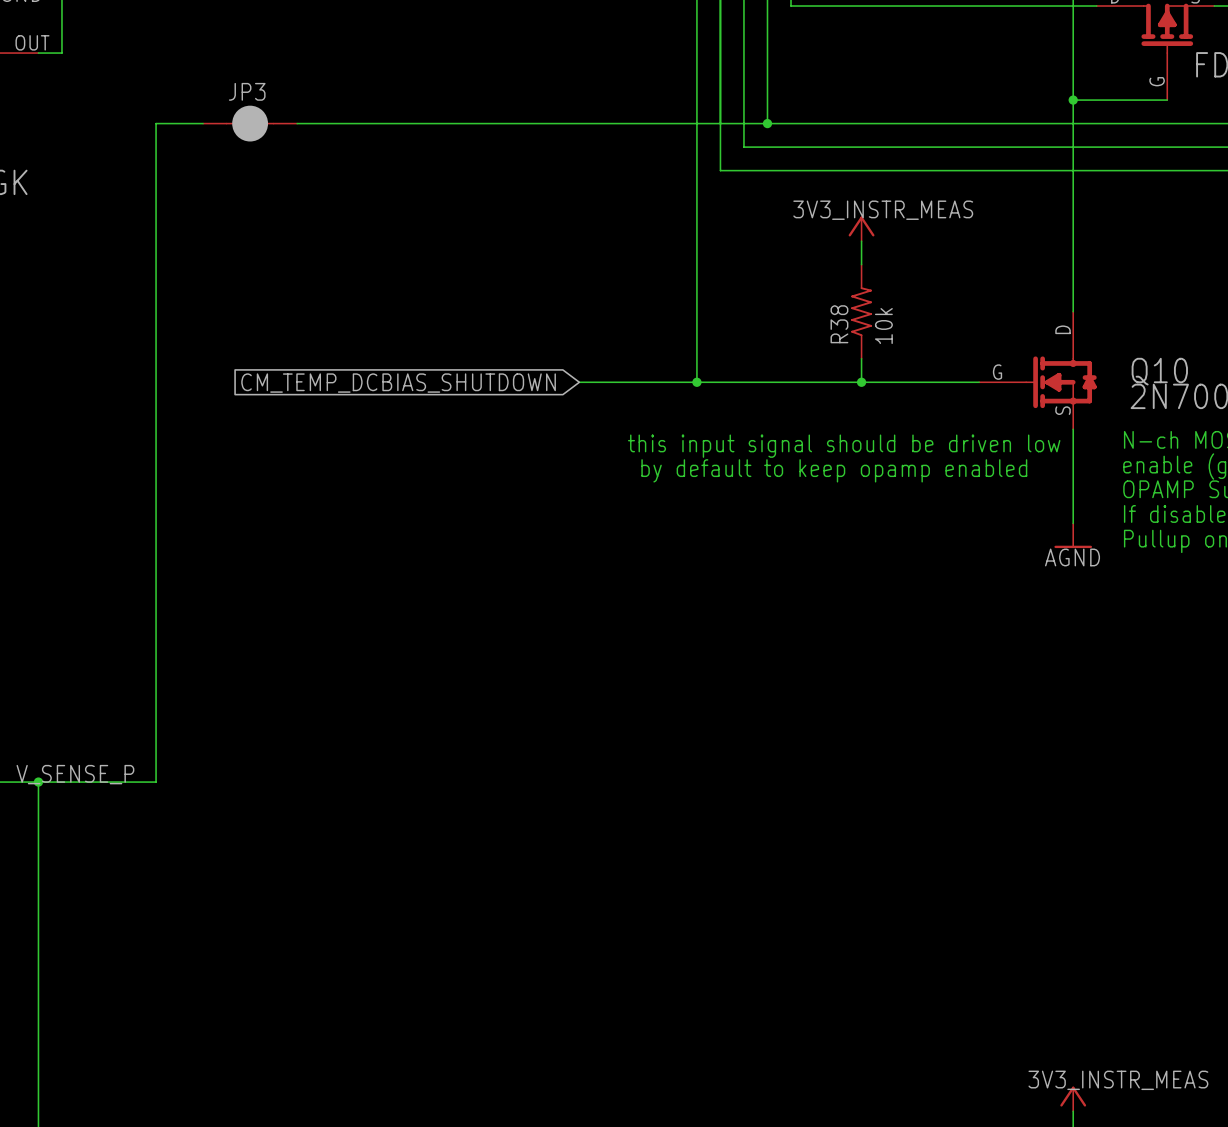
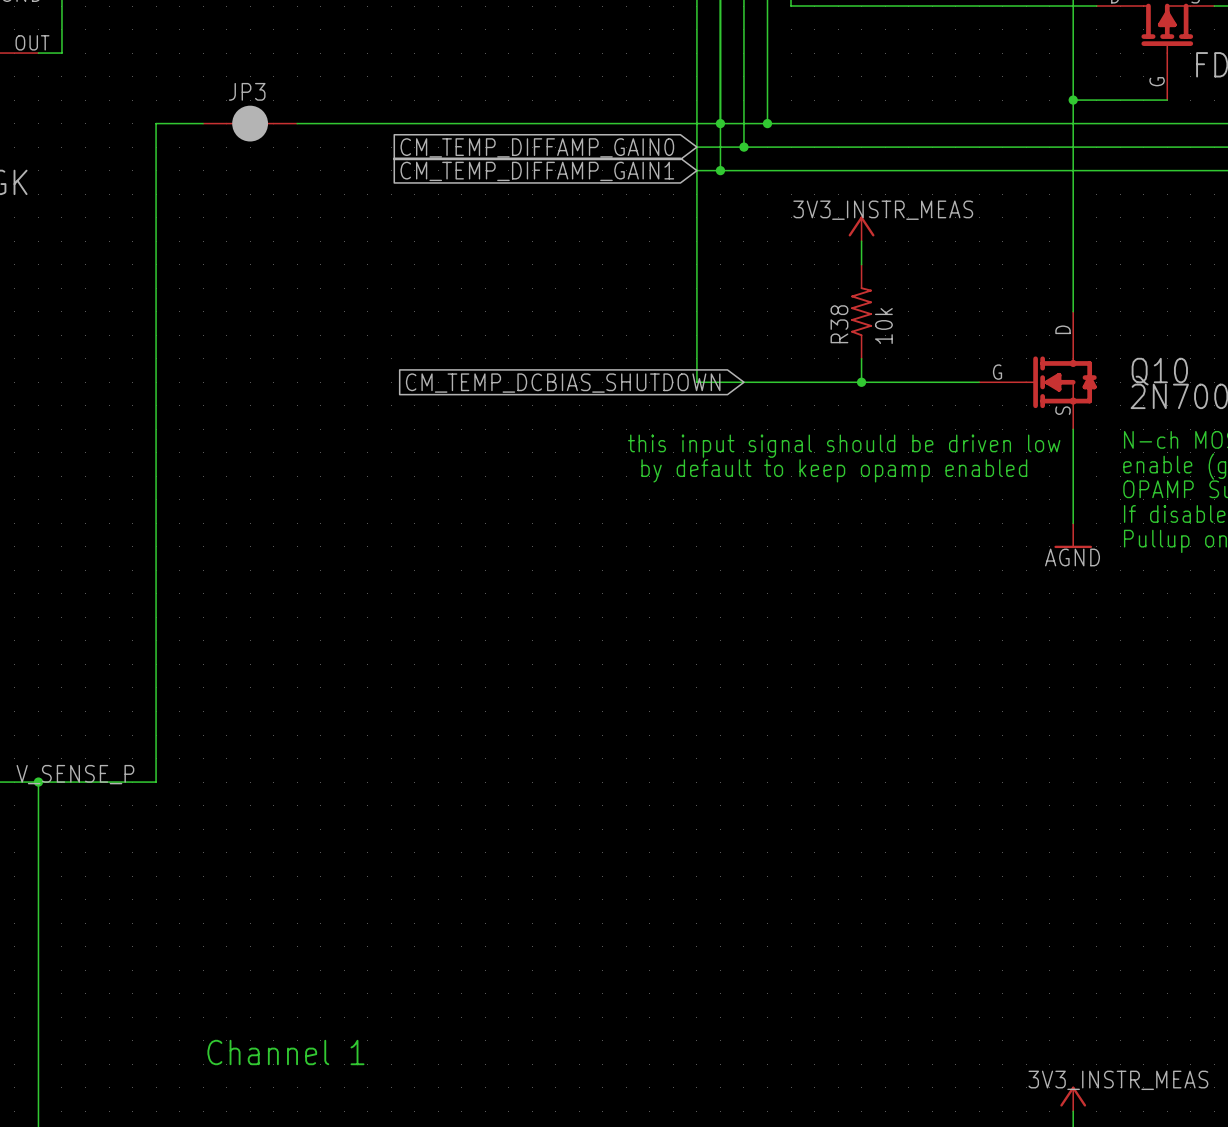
junction: none -> (720, 123)
global label: none -> CM_TEMP_DIFFAMP_GAIN0 (537, 147)
wire: none -> (696, 147) (743, 147)
junction: none -> (743, 147)
wire: none -> (696, 170) (720, 170)
junction: none -> (720, 170)
global label: none -> CM_TEMP_DIFFAMP_GAIN1 (537, 171)
wire: (579, 382) (696, 382) -> none
junction: (696, 382) -> none
global label position: CM_TEMP_DCBIAS_SHUTDOWN (398, 383) -> CM_TEMP_DCBIAS_SHUTDOWN (563, 383)
text: none -> Channel 1 (285, 1052)

